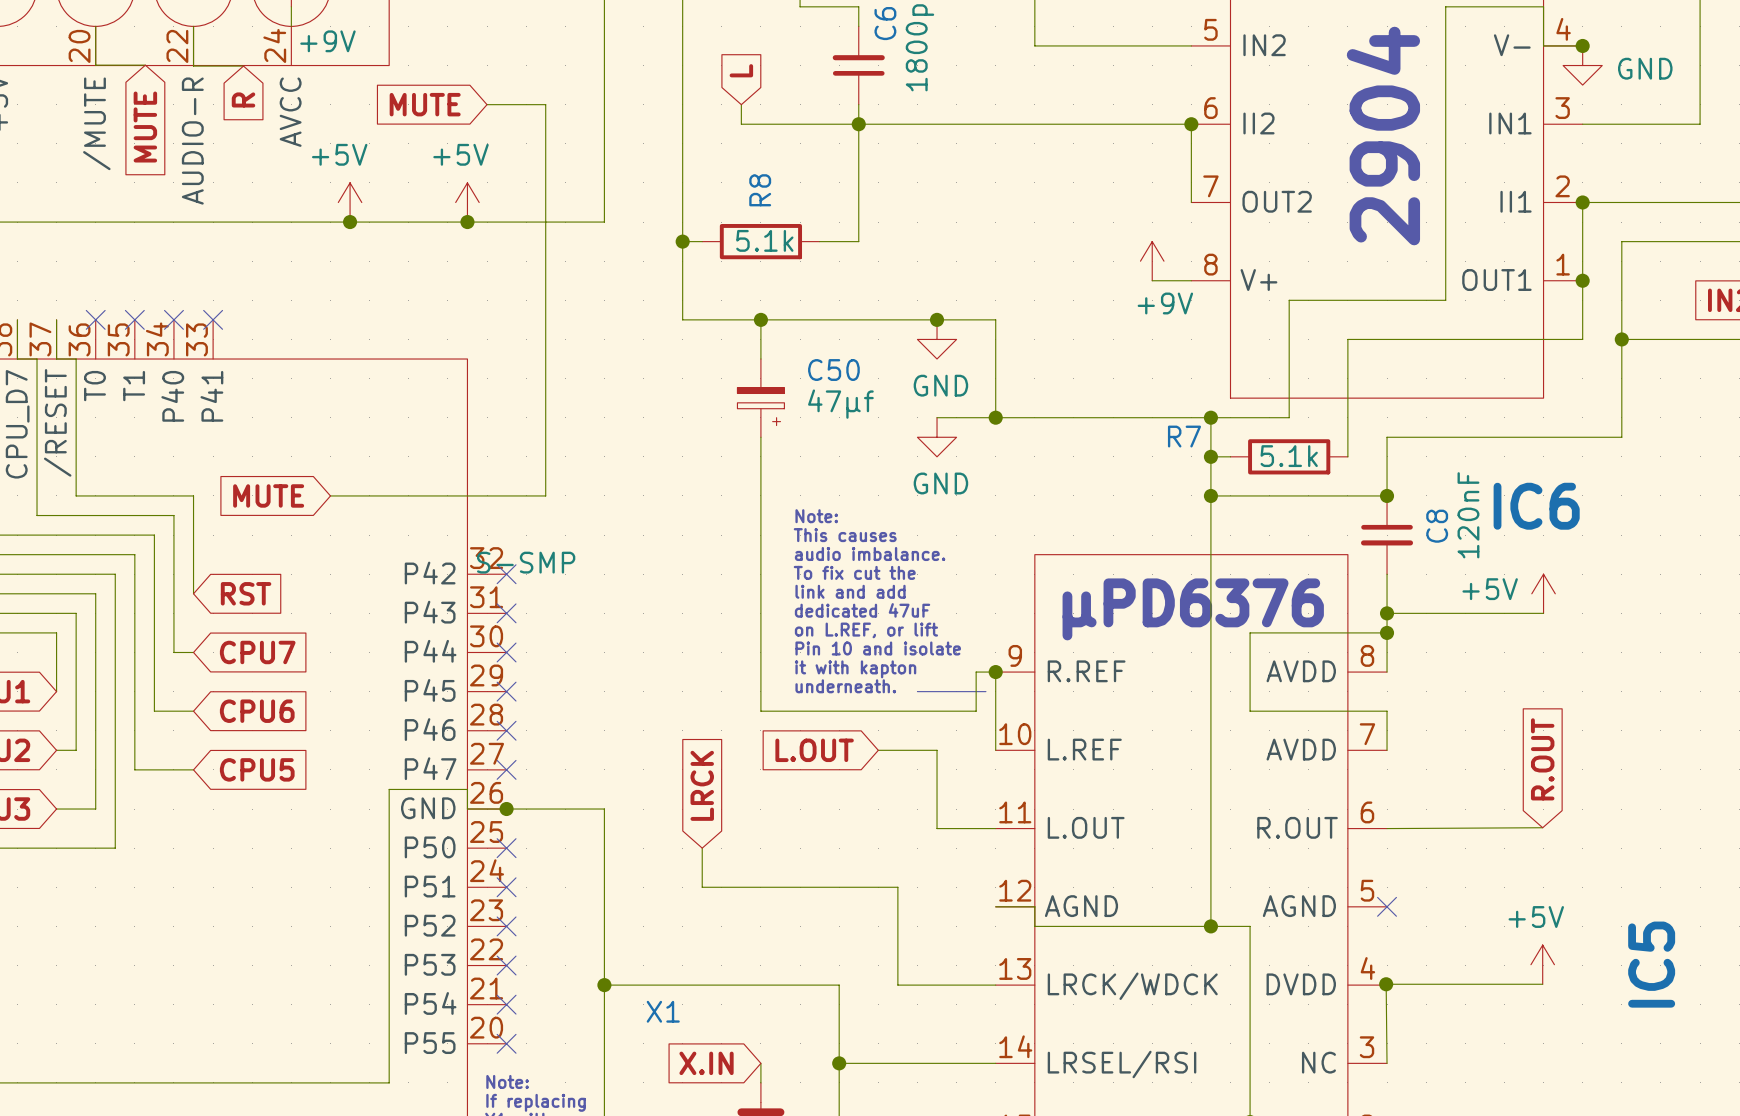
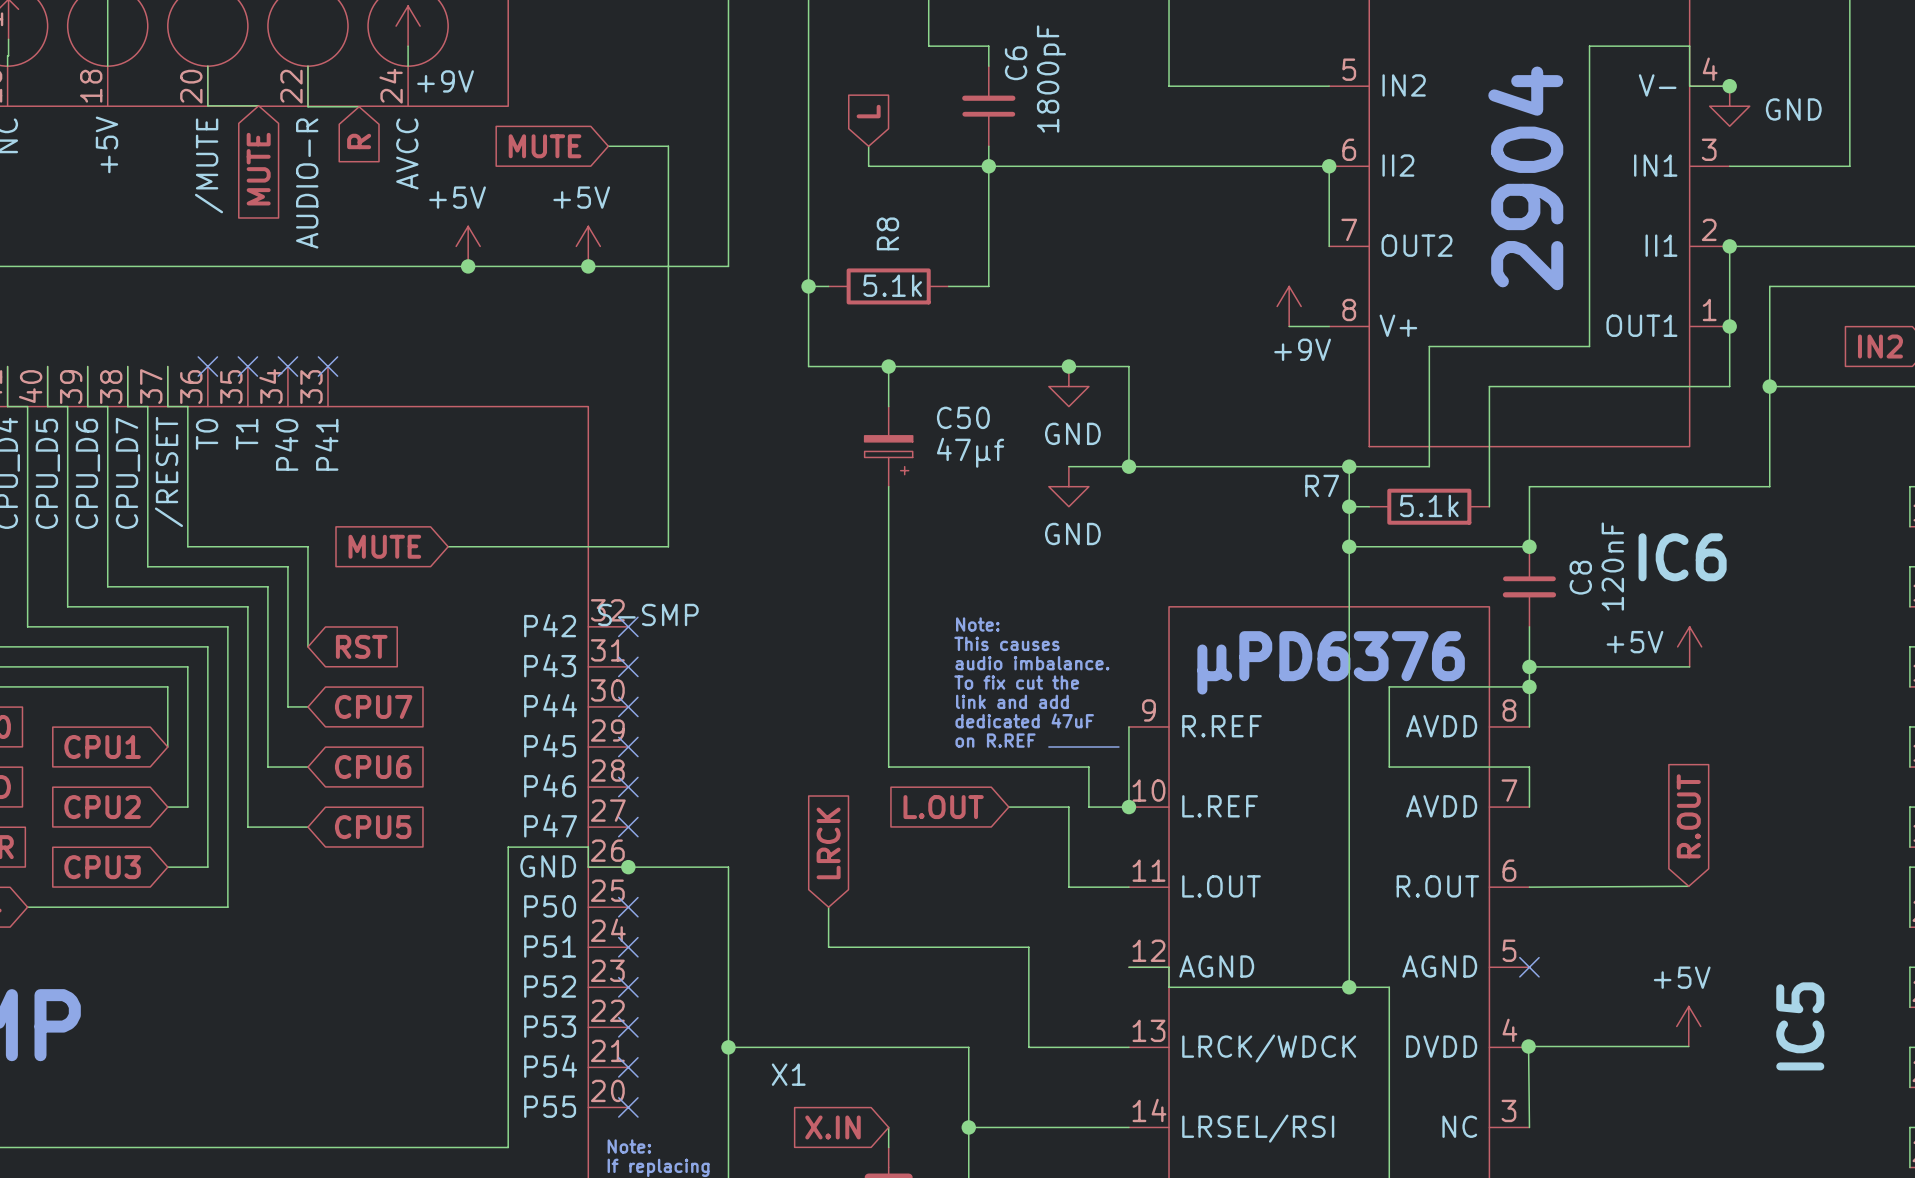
text position: Note: (816, 516) -> Note: (977, 624)
text position: This causes (845, 535) -> This causes (1006, 643)
text position: audio imbalance. (870, 553) -> audio imbalance. (1032, 663)
text position: To fix cut the (854, 572) -> To fix cut the (1016, 682)
text position: link and add (850, 591) -> link and add (1012, 701)
text position: dedicated 47uF (862, 610) -> dedicated 47uF (1024, 720)
text: on L.REF, or lift (866, 630) -> none
text: Pin 10 and isolate (878, 648) -> none
text: it with kapton (855, 669) -> none
wire: (995, 672) (976, 672) (976, 711) (956, 711) -> (1128, 807) (1088, 807) (1088, 767)
junction position: (995, 672) -> (1128, 807)
text: none -> on R.REF (995, 740)
text: underneath. (845, 686) -> none

